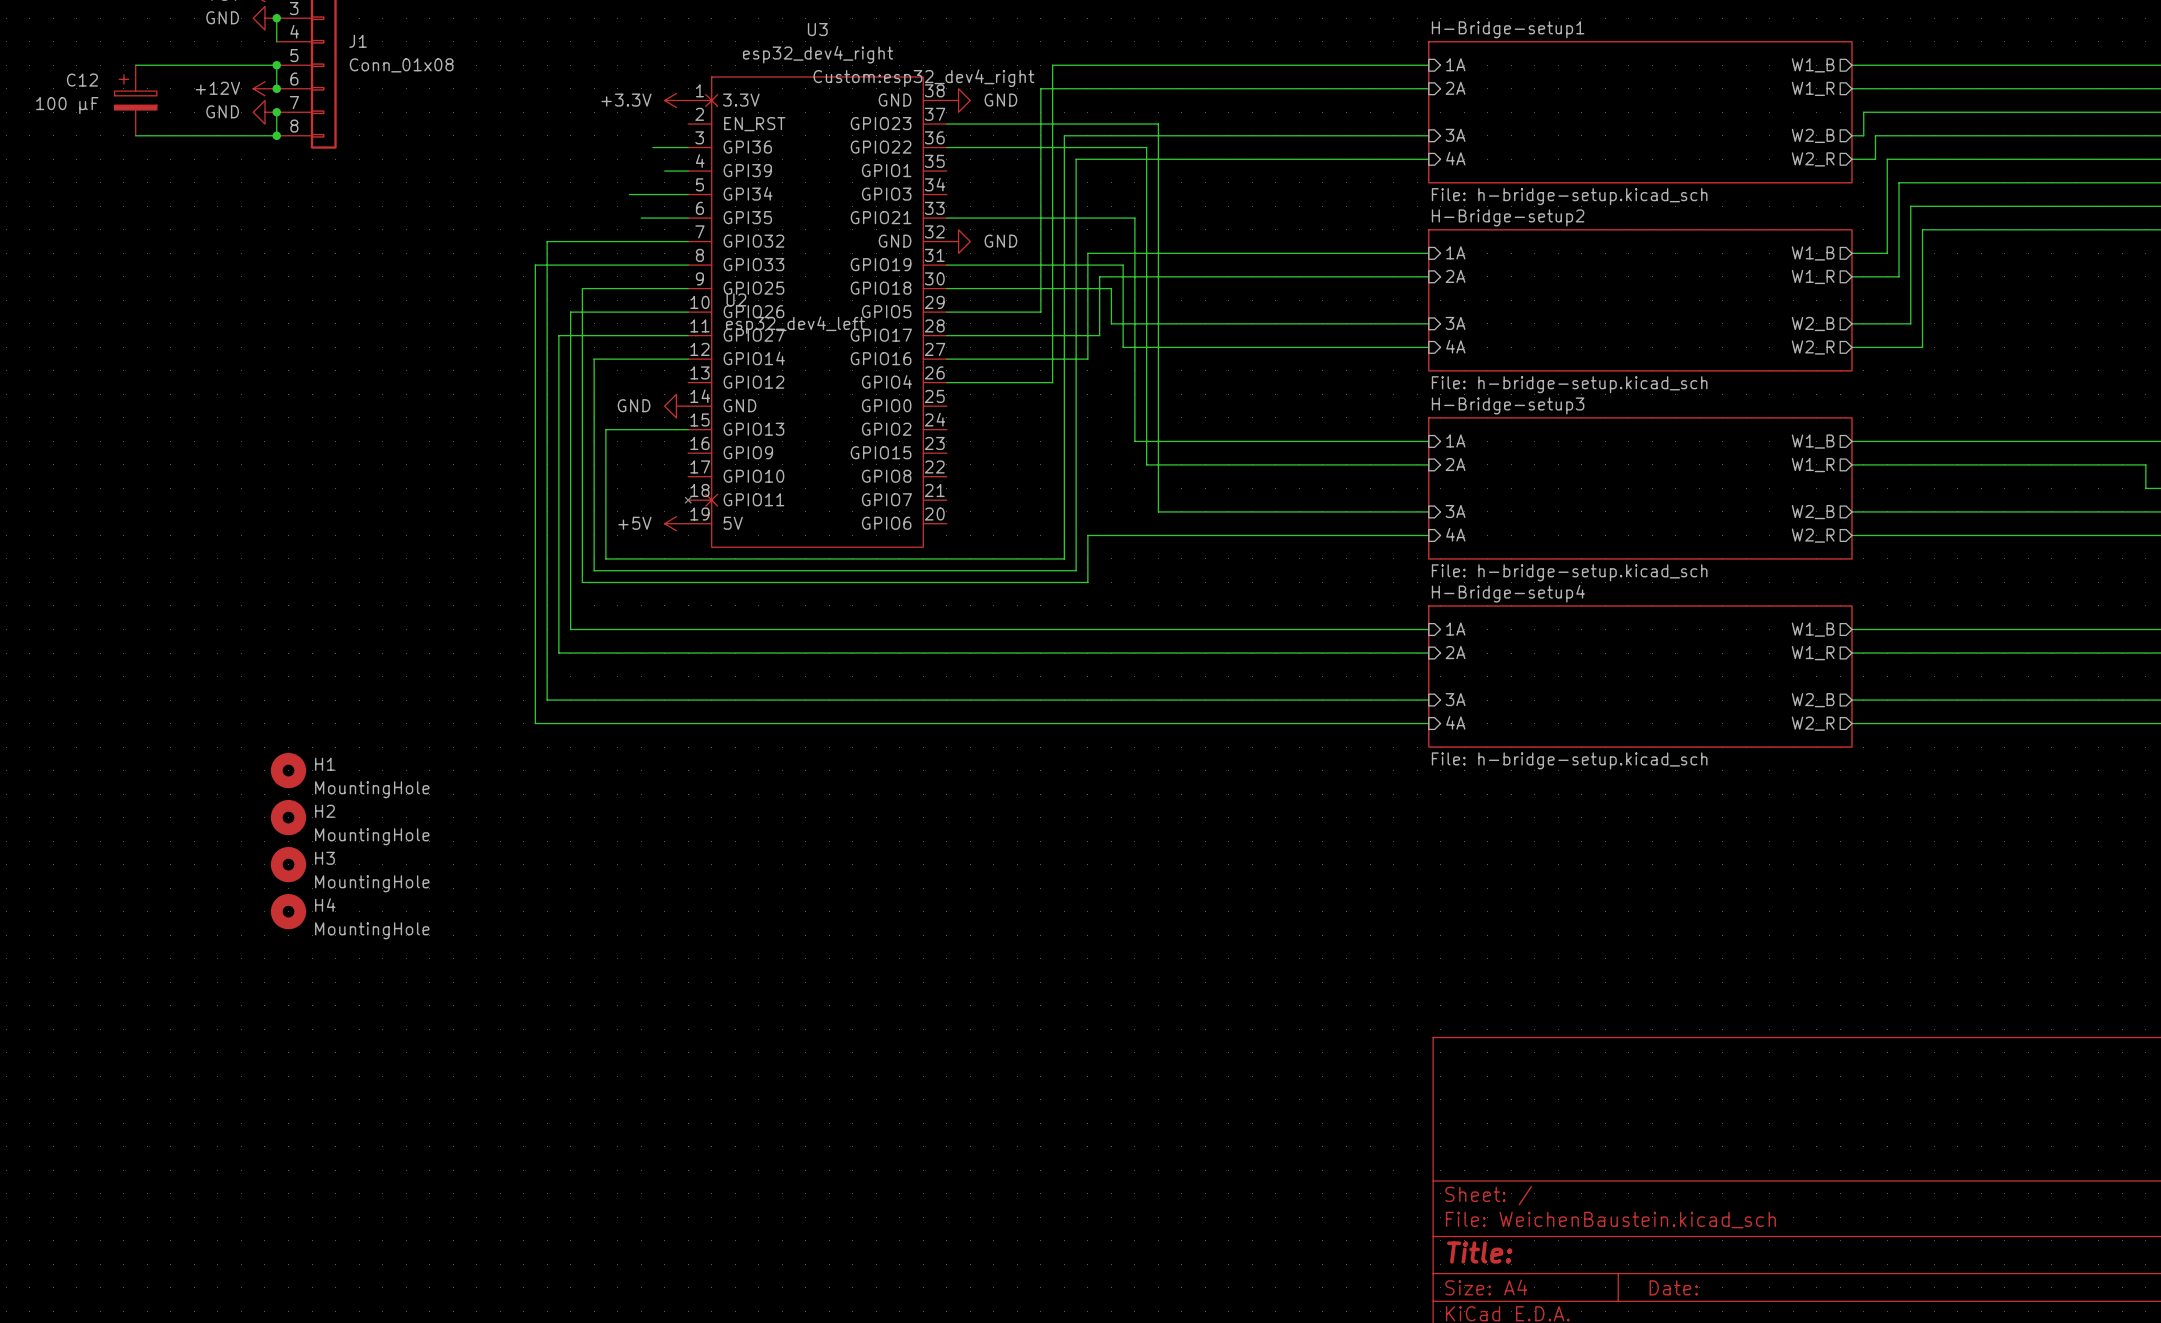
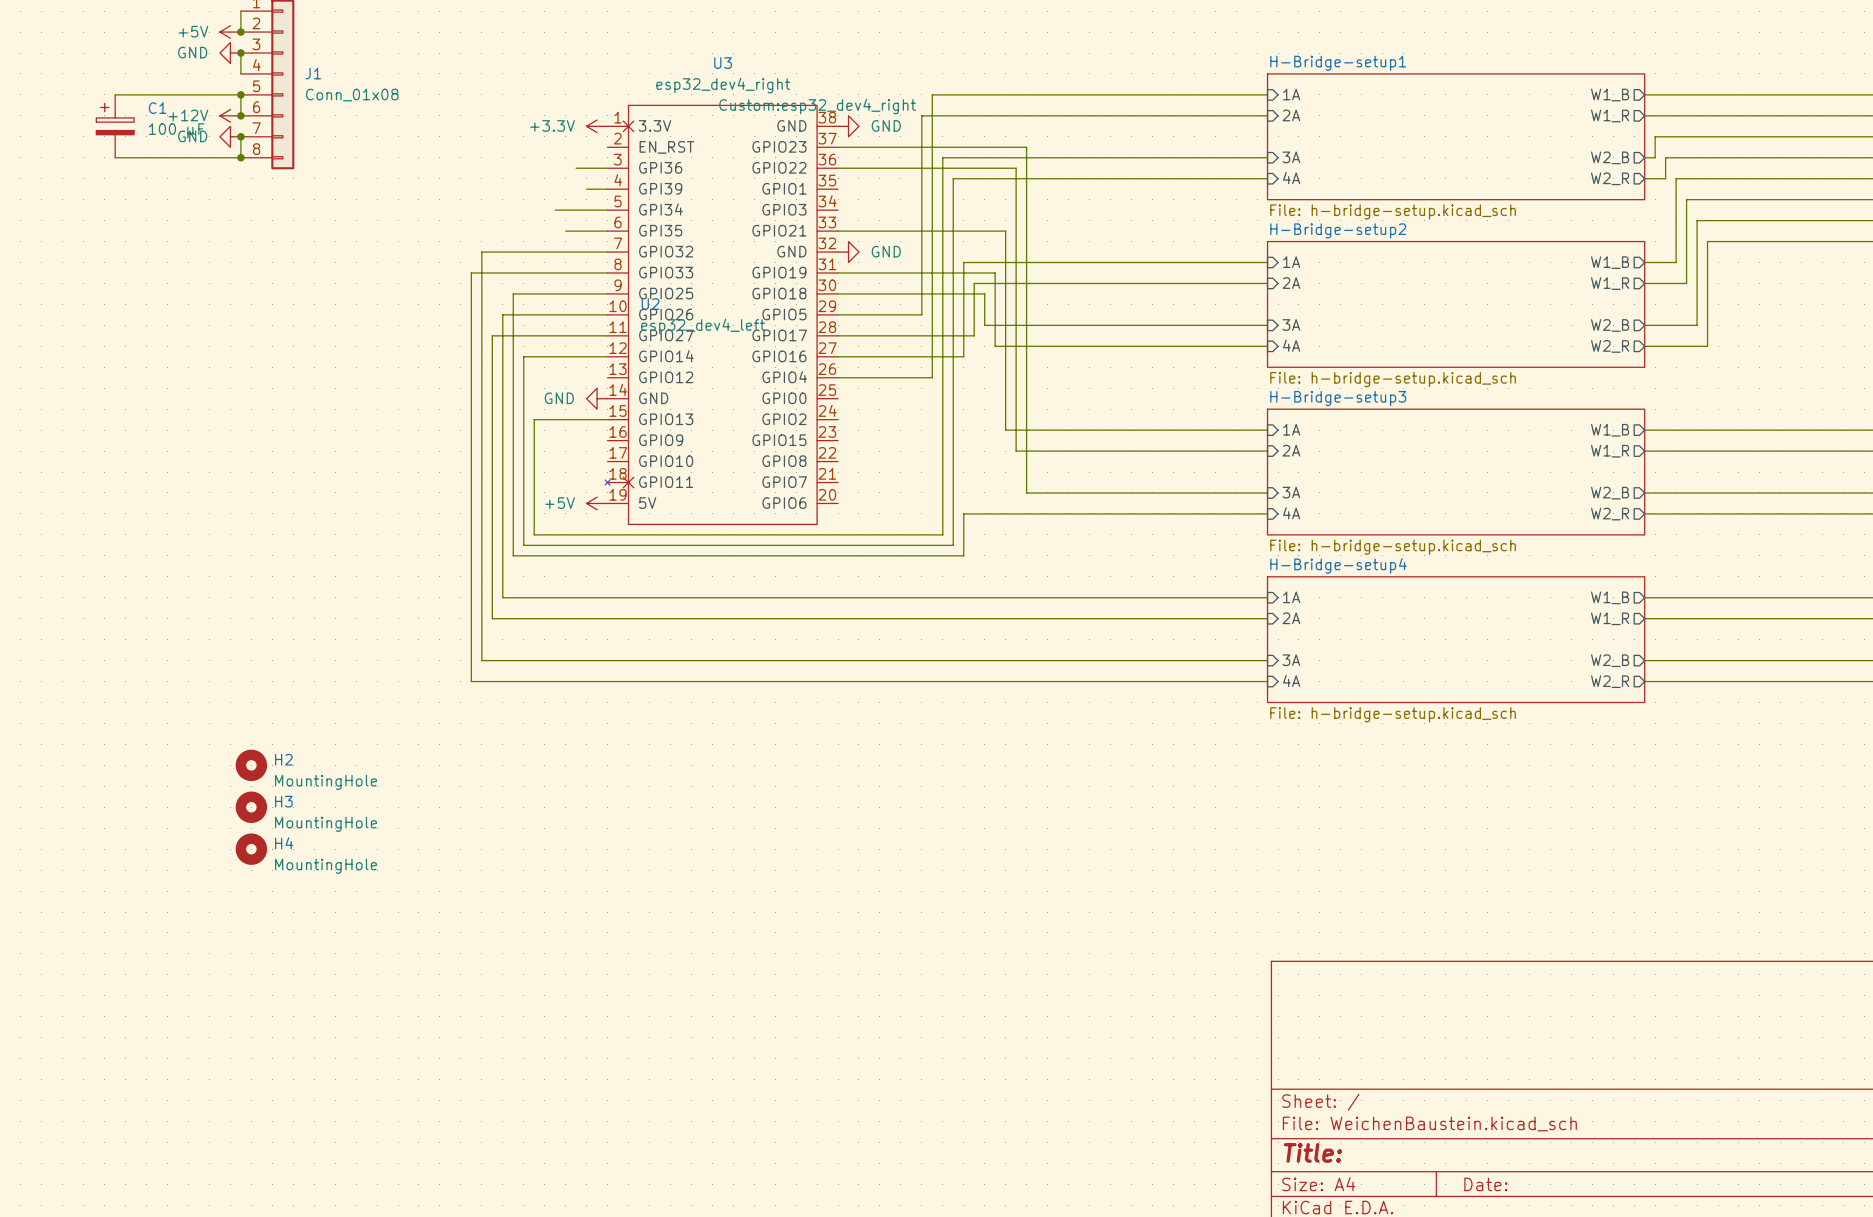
C12 name: C12 (82, 80) -> C1 (157, 108)
C12 value position: 100 µF (67, 105) -> 100 µF (176, 130)
H1: MountingHole (288, 770) -> none

